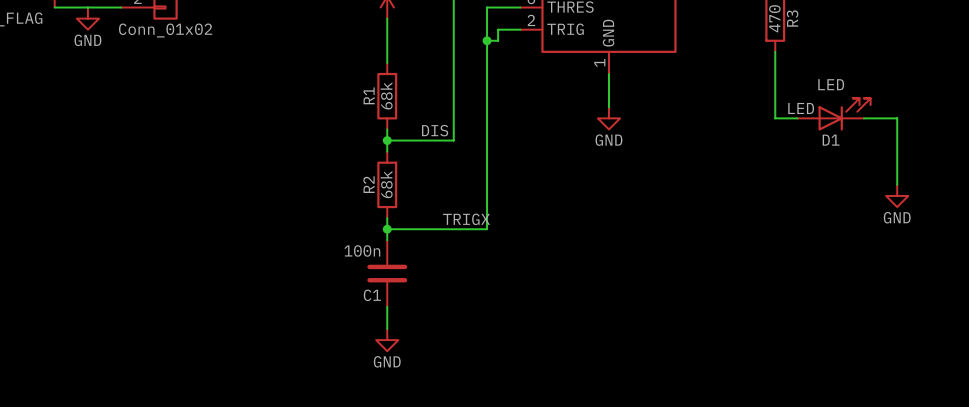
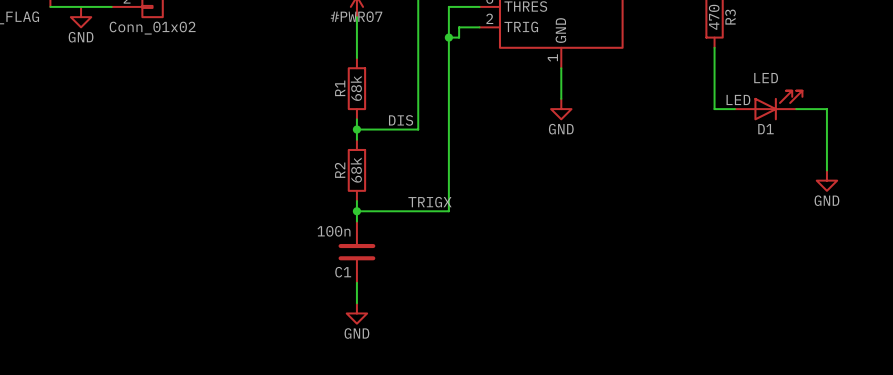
#PWR07 name: none -> #PWR07 (356, 16)

